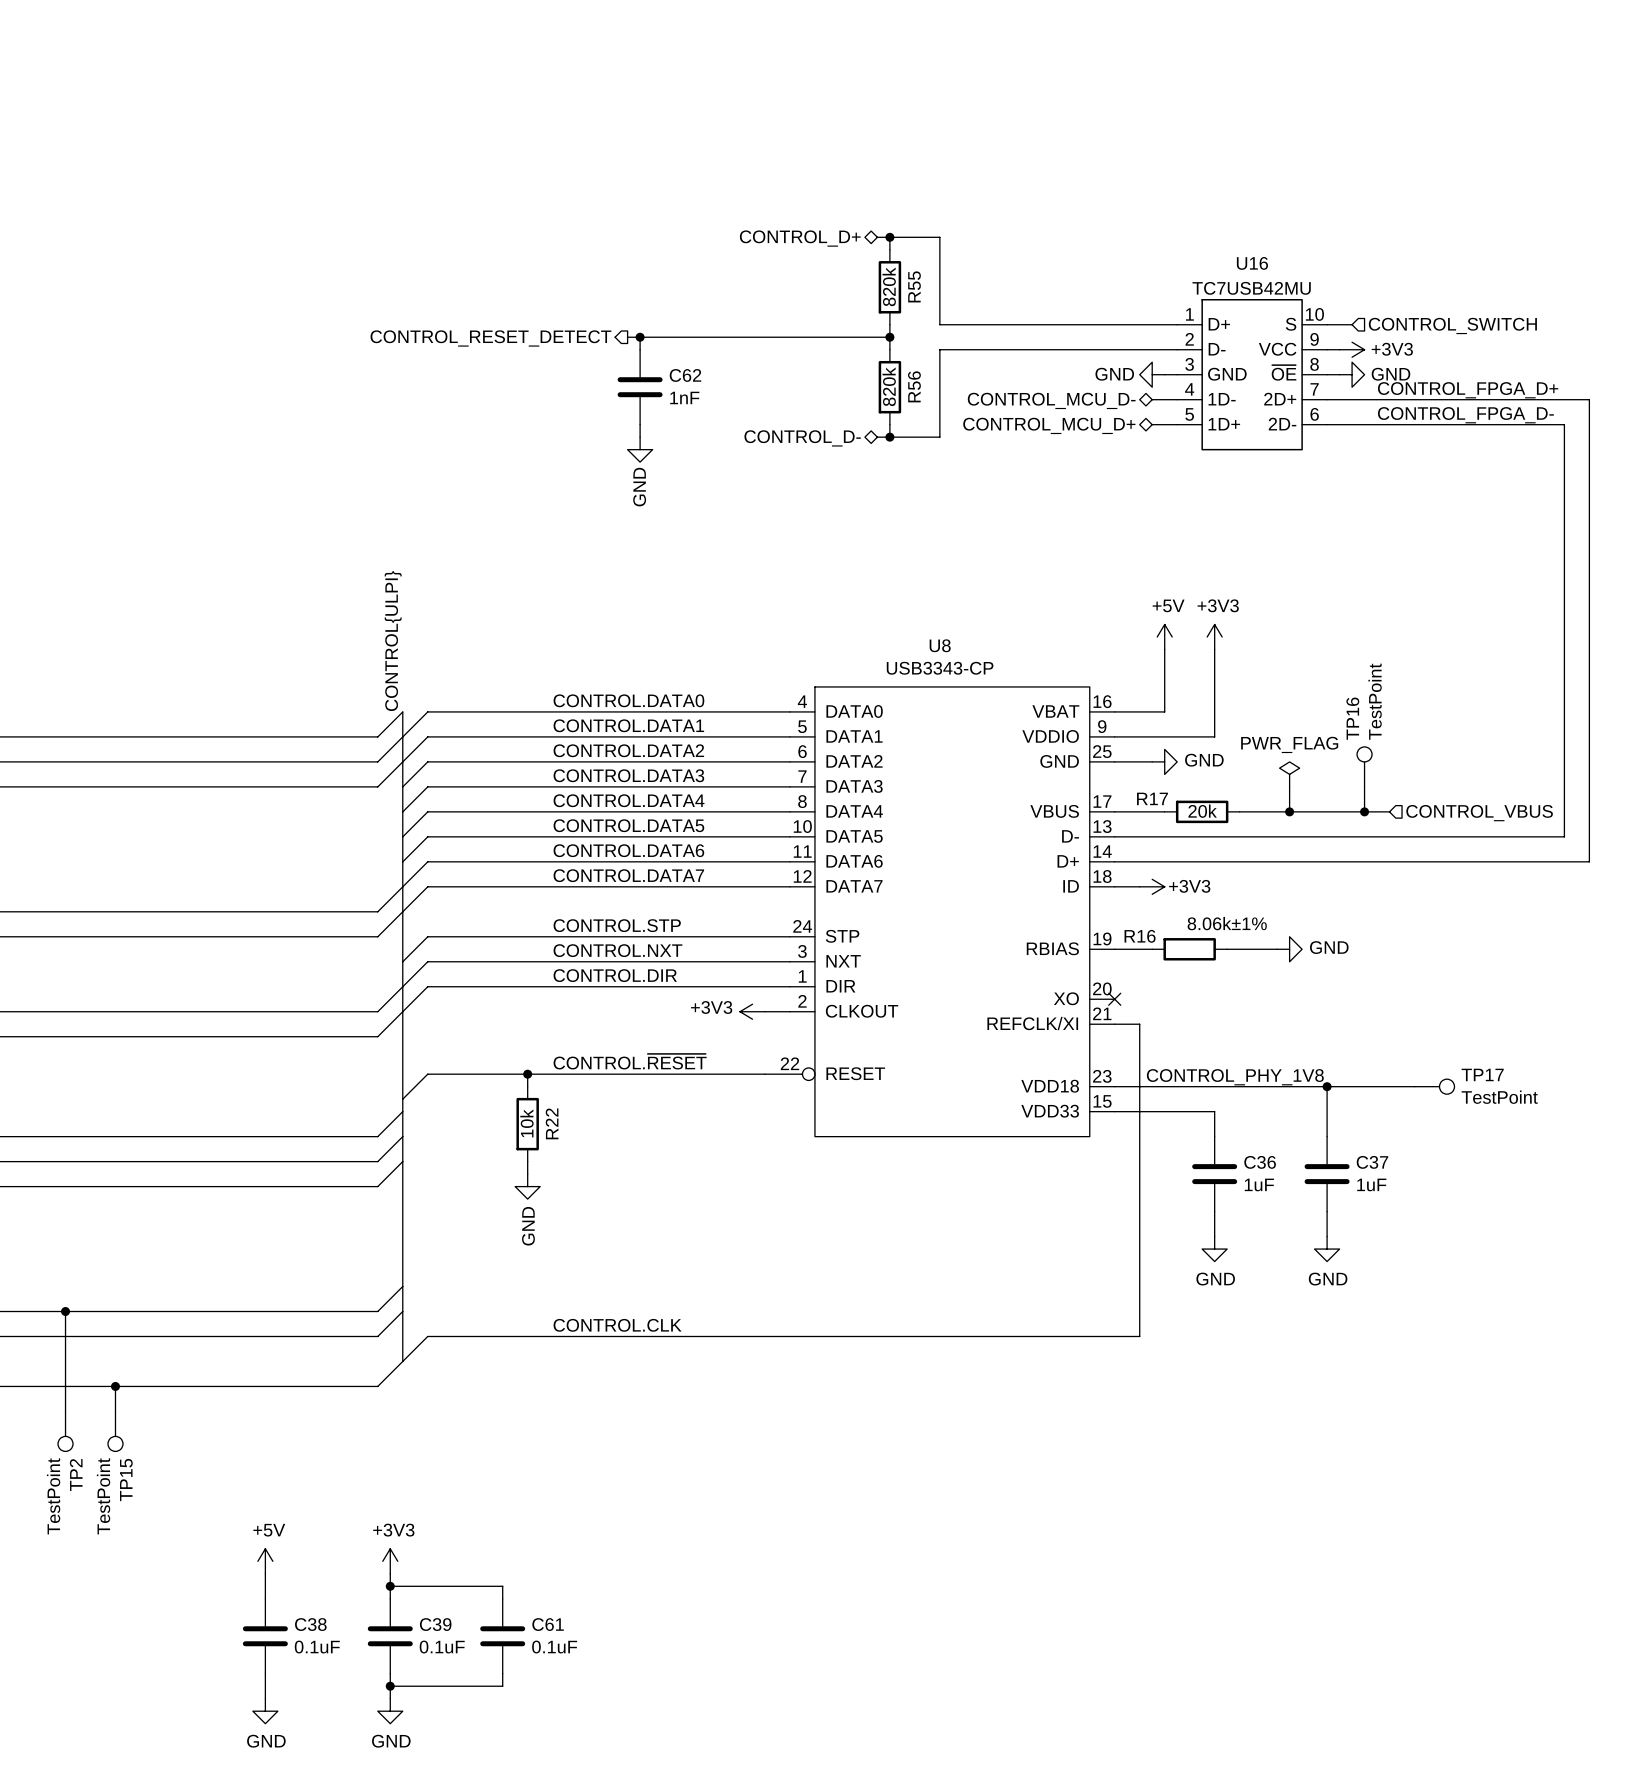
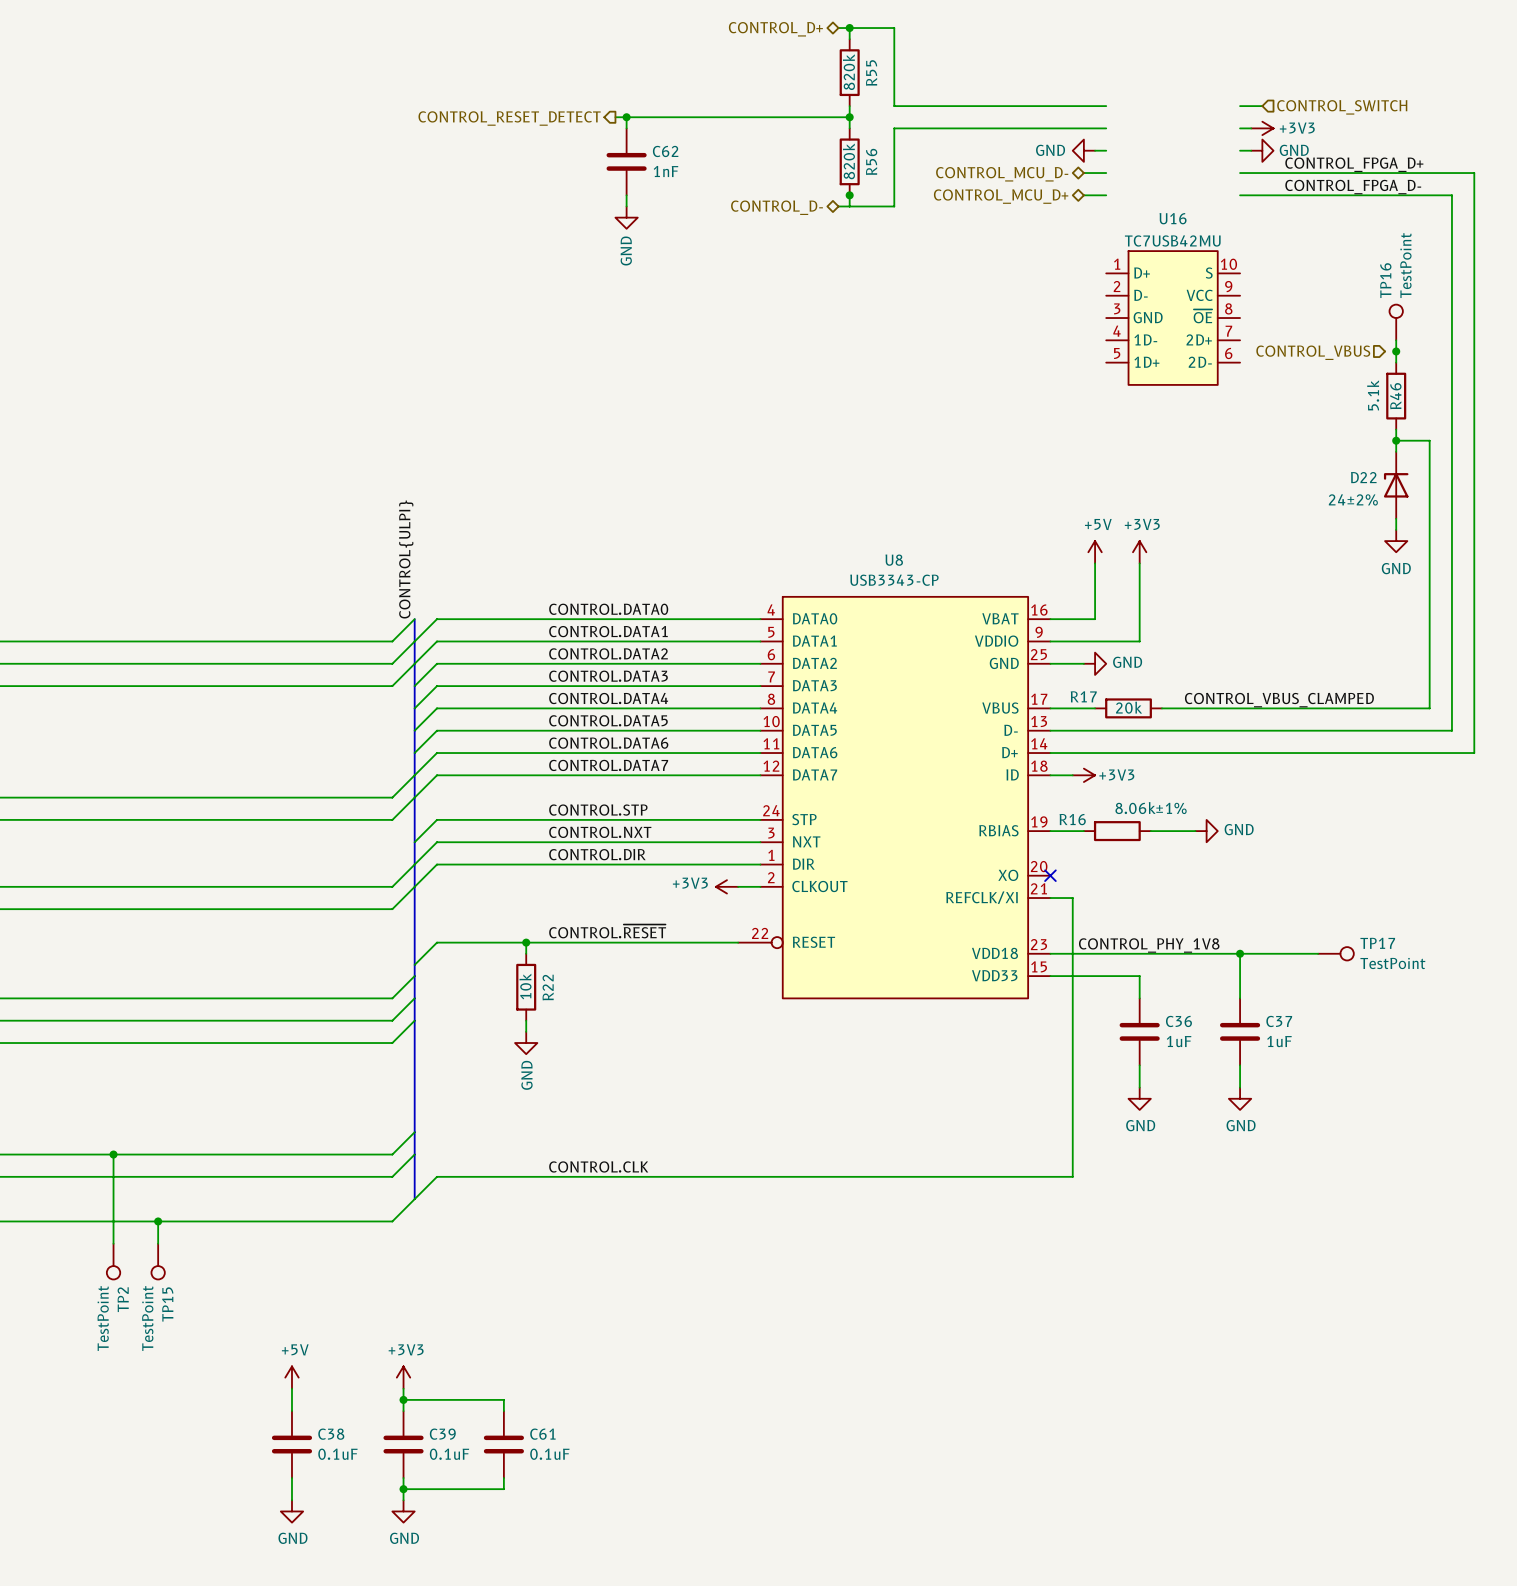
wire: none -> (838, 28) (894, 28) (894, 106) (1106, 106)
wire: none -> (849, 28) (849, 39)
junction: none -> (849, 28)
junction: none -> (626, 117)
junction: none -> (849, 117)
power symbol: none -> GND (1083, 150)
power symbol: none -> GND (1262, 150)
wire: (877, 237) (939, 237) -> (1106, 128) (894, 128) (894, 195)
hierarchical label position: CONTROL_D+ (800, 238) -> CONTROL_D+ (775, 29)
wire: (939, 249) (939, 324) (1177, 324) -> (894, 206) (838, 206)
R55 position: (889, 287) -> (849, 72)
wire: (889, 324) (889, 349) -> (849, 106) (849, 128)
wire: (1327, 324) (1352, 324) -> (1240, 106) (1262, 106)
hierarchical label position: CONTROL_SWITCH (1452, 325) -> CONTROL_SWITCH (1342, 107)
wire: (627, 337) (889, 337) -> (615, 117) (849, 117)
wire: (640, 337) (640, 349) -> (626, 117) (626, 128)
junction: (640, 337) -> none
junction: (889, 337) -> none
hierarchical label position: CONTROL_RESET_DETECT (490, 338) -> CONTROL_RESET_DETECT (509, 118)
wire: (1177, 349) (939, 349) (939, 437) (877, 437) -> none
wire: (1327, 349) (1339, 349) -> (1240, 128) (1251, 128)
power symbol position: +3V3 (1352, 349) -> +3V3 (1262, 128)
power symbol: GND (1152, 374) -> none
wire: (1164, 374) (1177, 374) -> (1095, 150) (1106, 150)
wire: (1327, 374) (1339, 374) -> (1240, 150) (1251, 150)
power symbol: GND (1352, 374) -> none
C62 position: (640, 387) -> (626, 161)
R56 position: (889, 387) -> (849, 161)
label position: CONTROL_FPGA_D+ (1468, 390) -> CONTROL_FPGA_D+ (1354, 164)
wire: (1152, 399) (1177, 399) -> (1083, 173) (1106, 173)
wire: (1327, 399) (1589, 399) -> (1240, 173) (1474, 173) (1474, 340)
wire: none -> (1396, 340) (1396, 362)
hierarchical label position: CONTROL_MCU_D- (1051, 400) -> CONTROL_MCU_D- (1002, 174)
junction: none -> (1396, 351)
hierarchical label: none -> CONTROL_VBUS (1313, 352)
label position: CONTROL_FPGA_D- (1465, 415) -> CONTROL_FPGA_D- (1353, 187)
wire: (640, 424) (640, 437) -> (626, 195) (626, 206)
wire: (889, 424) (889, 437) -> none
wire: (1152, 424) (1177, 424) -> (1083, 195) (1106, 195)
wire: (1327, 424) (1564, 424) -> (1240, 195) (1451, 195) (1451, 362)
hierarchical label position: CONTROL_MCU_D+ (1049, 425) -> CONTROL_MCU_D+ (1001, 196)
junction: (889, 437) -> none
hierarchical label position: CONTROL_D- (802, 438) -> CONTROL_D- (776, 207)
power symbol position: GND (640, 449) -> GND (626, 217)
R46: none -> 5.1k (1396, 396)
wire: none -> (1396, 429) (1396, 451)
wire: none -> (1396, 440) (1429, 440) (1429, 708) (1295, 708)
junction: none -> (1396, 440)
D22: none -> 24±2% (1396, 485)
wire: none -> (1396, 518) (1396, 529)
power symbol: none -> GND (1396, 541)
TP16 position: (1364, 766) -> (1396, 322)
power symbol: PWR_FLAG (1289, 774) -> none
wire: (1289, 786) (1289, 811) -> none
wire: (1364, 786) (1364, 811) -> none
label: none -> CONTROL_VBUS_CLAMPED (1279, 700)
junction: (1289, 811) -> none
junction: (1364, 811) -> none
hierarchical label: CONTROL_VBUS (1479, 813) -> none

